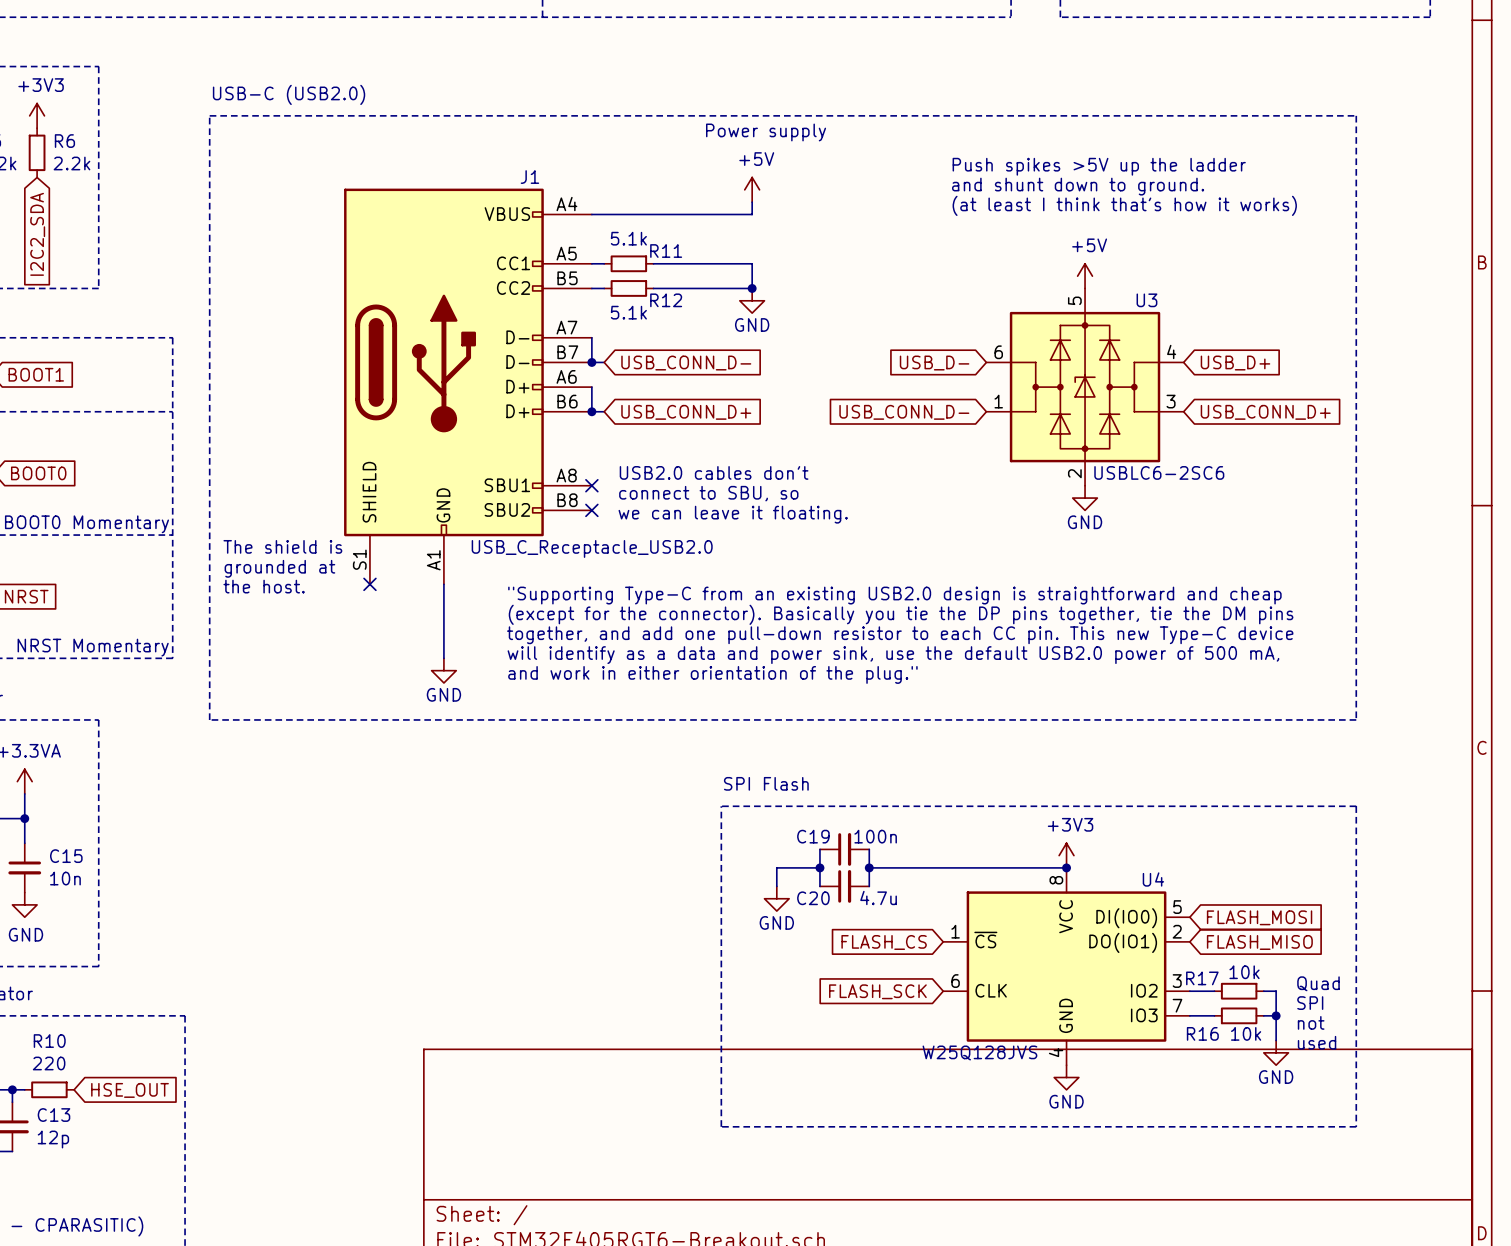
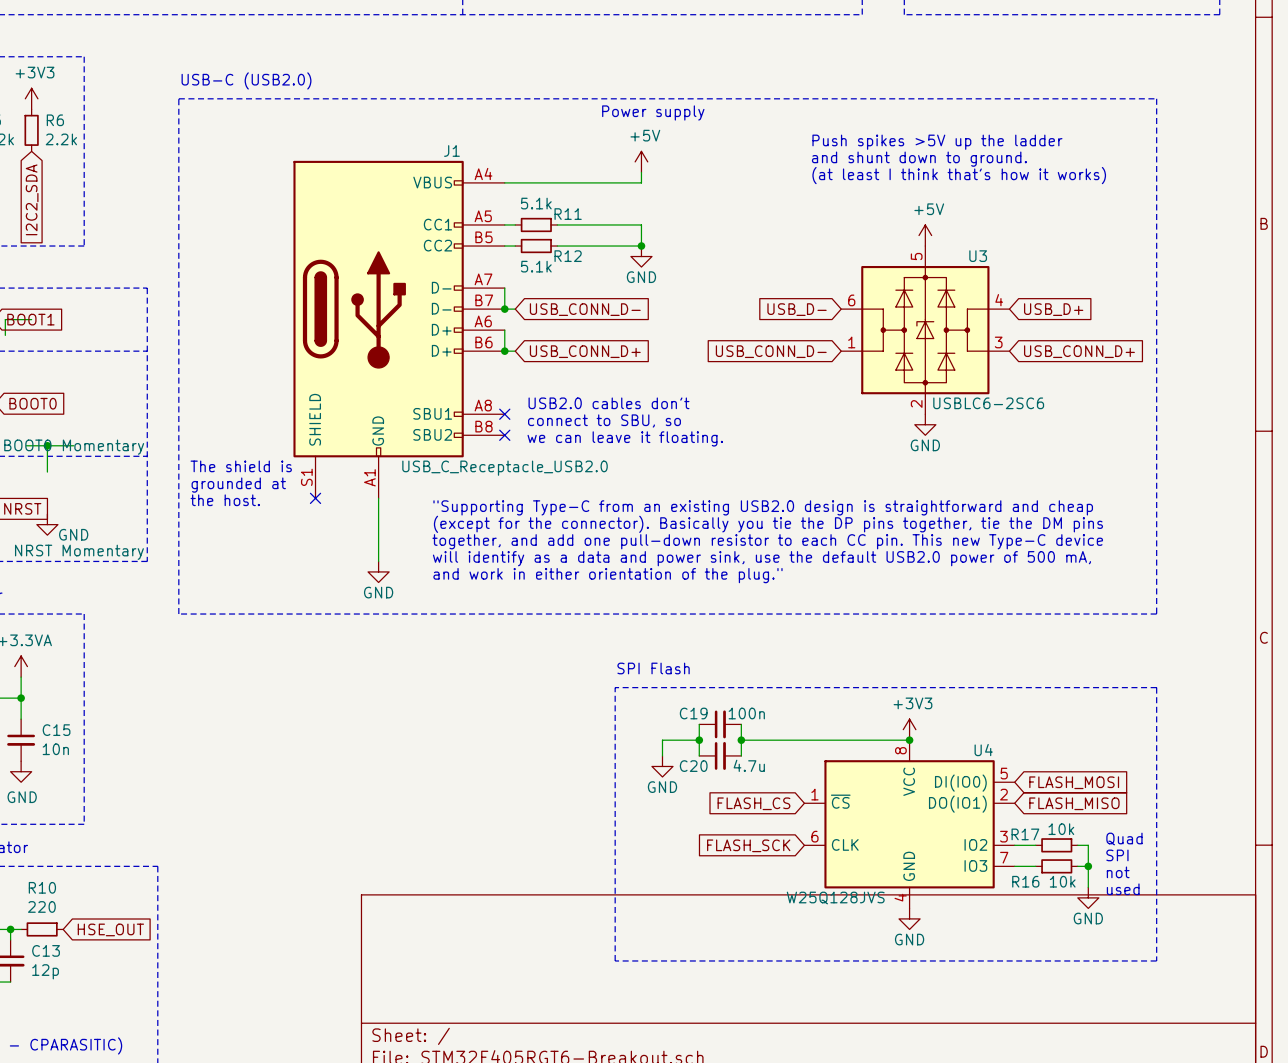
wire: none -> (31, 319) (5, 319) (5, 335)
wire: none -> (26, 445) (73, 445)
wire: none -> (47, 445) (47, 472)
junction: none -> (47, 445)
power symbol: none -> GND (47, 524)

